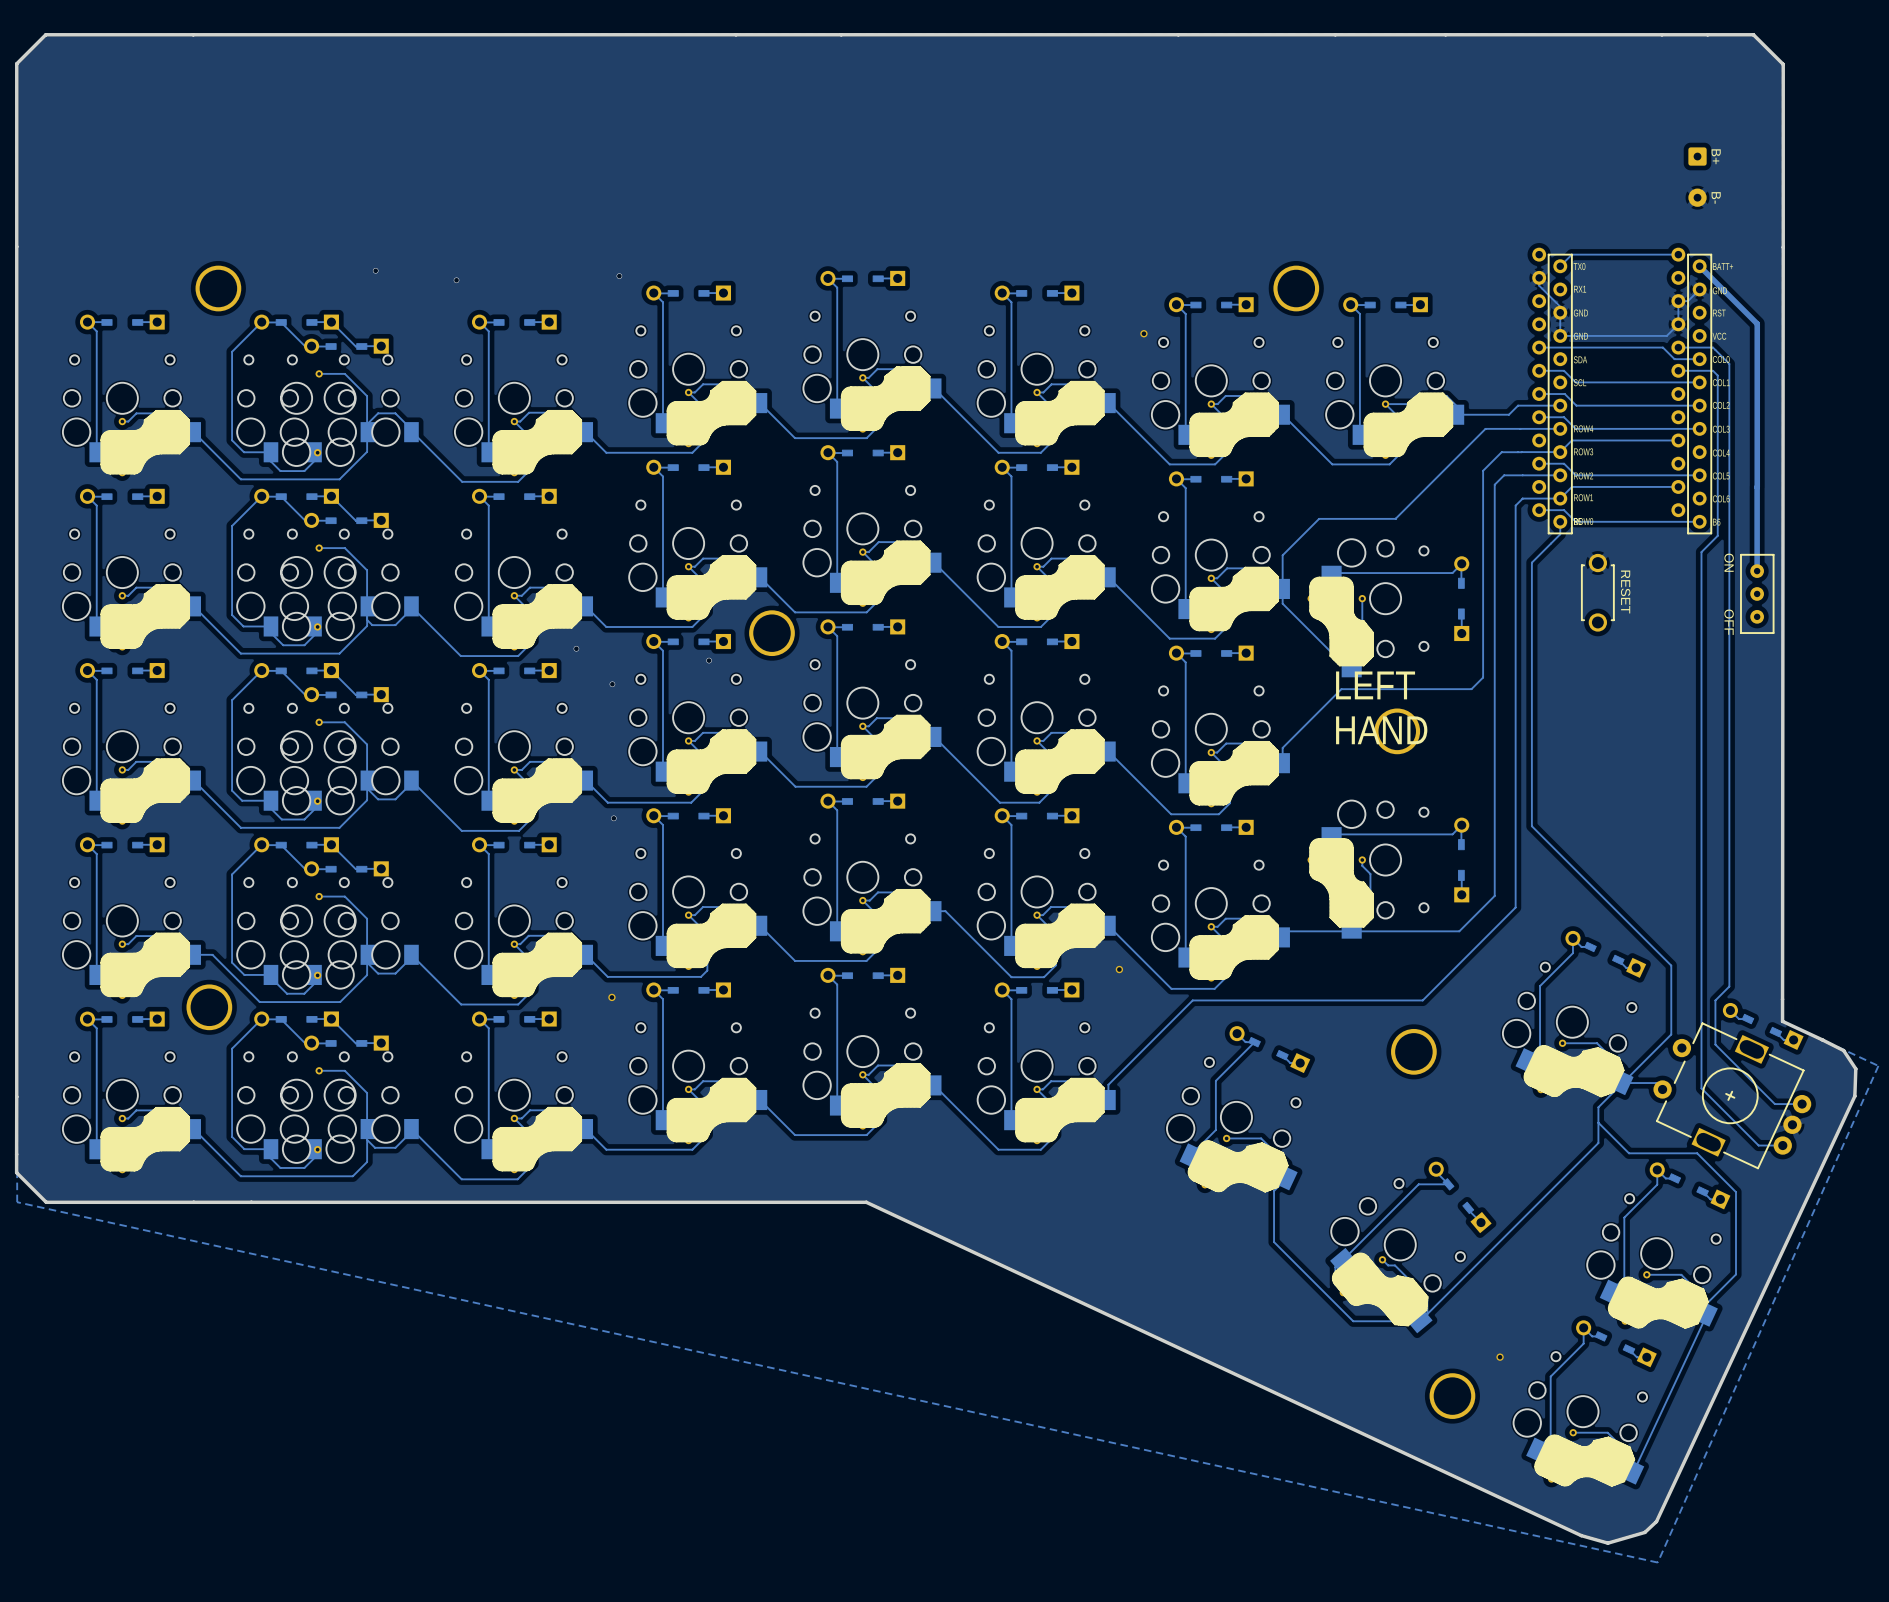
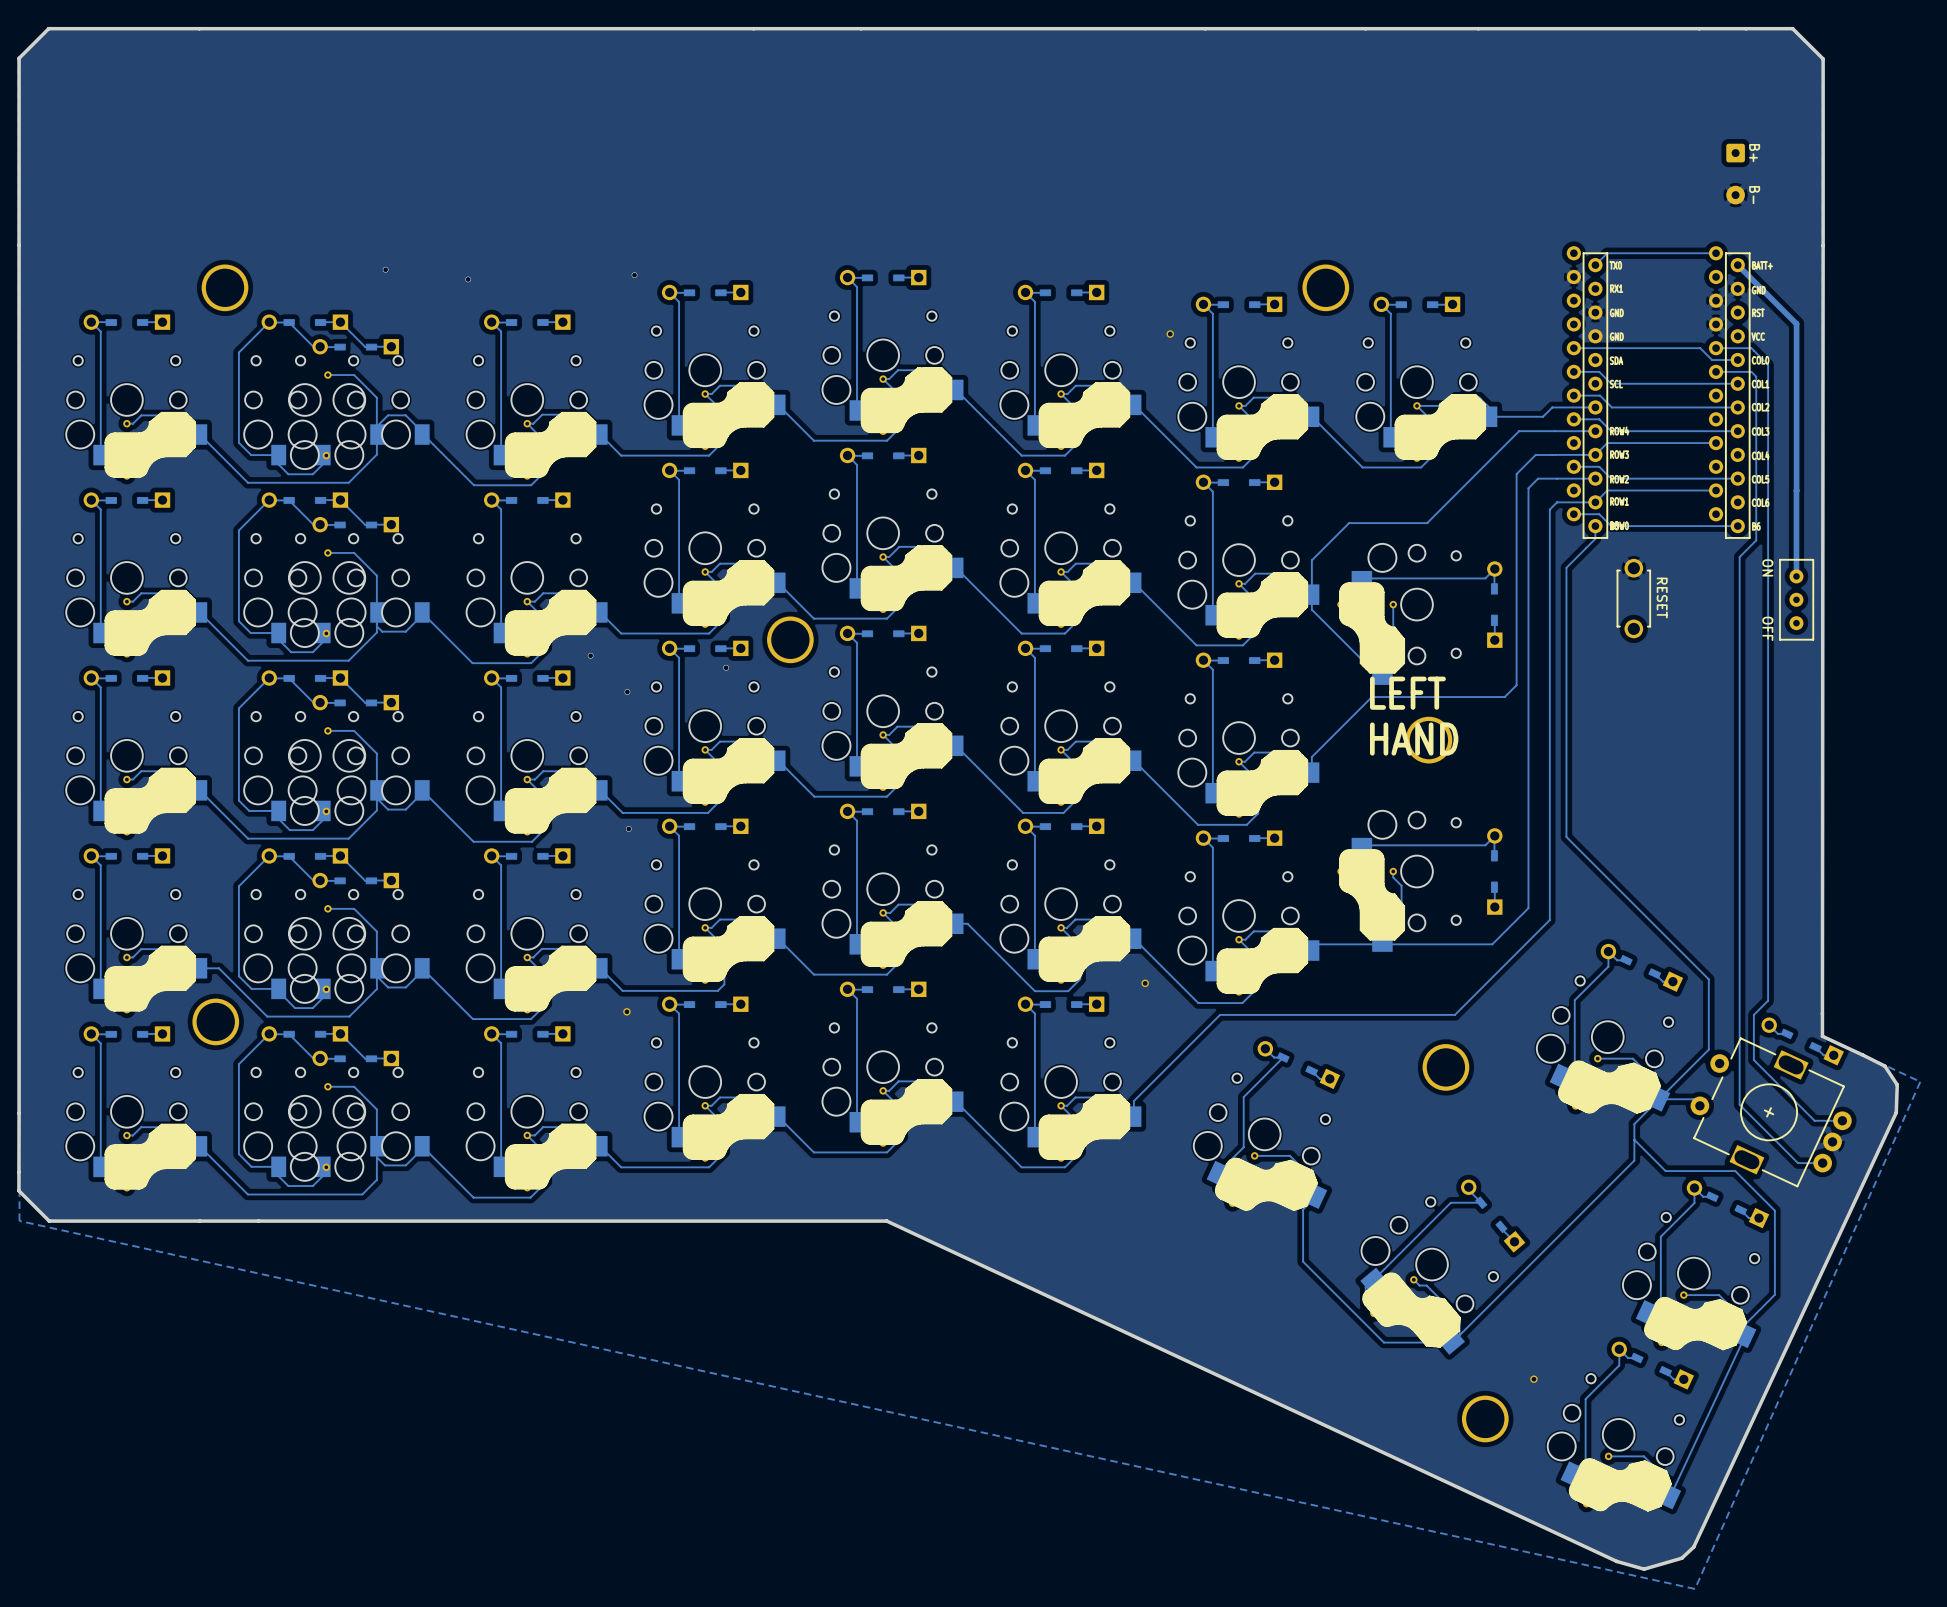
track: (1539, 277) (1539, 285) (1560, 306) (1560, 335) (1666, 335) (1678, 324) (1678, 301) (1688, 301) (1699, 289) -> none

